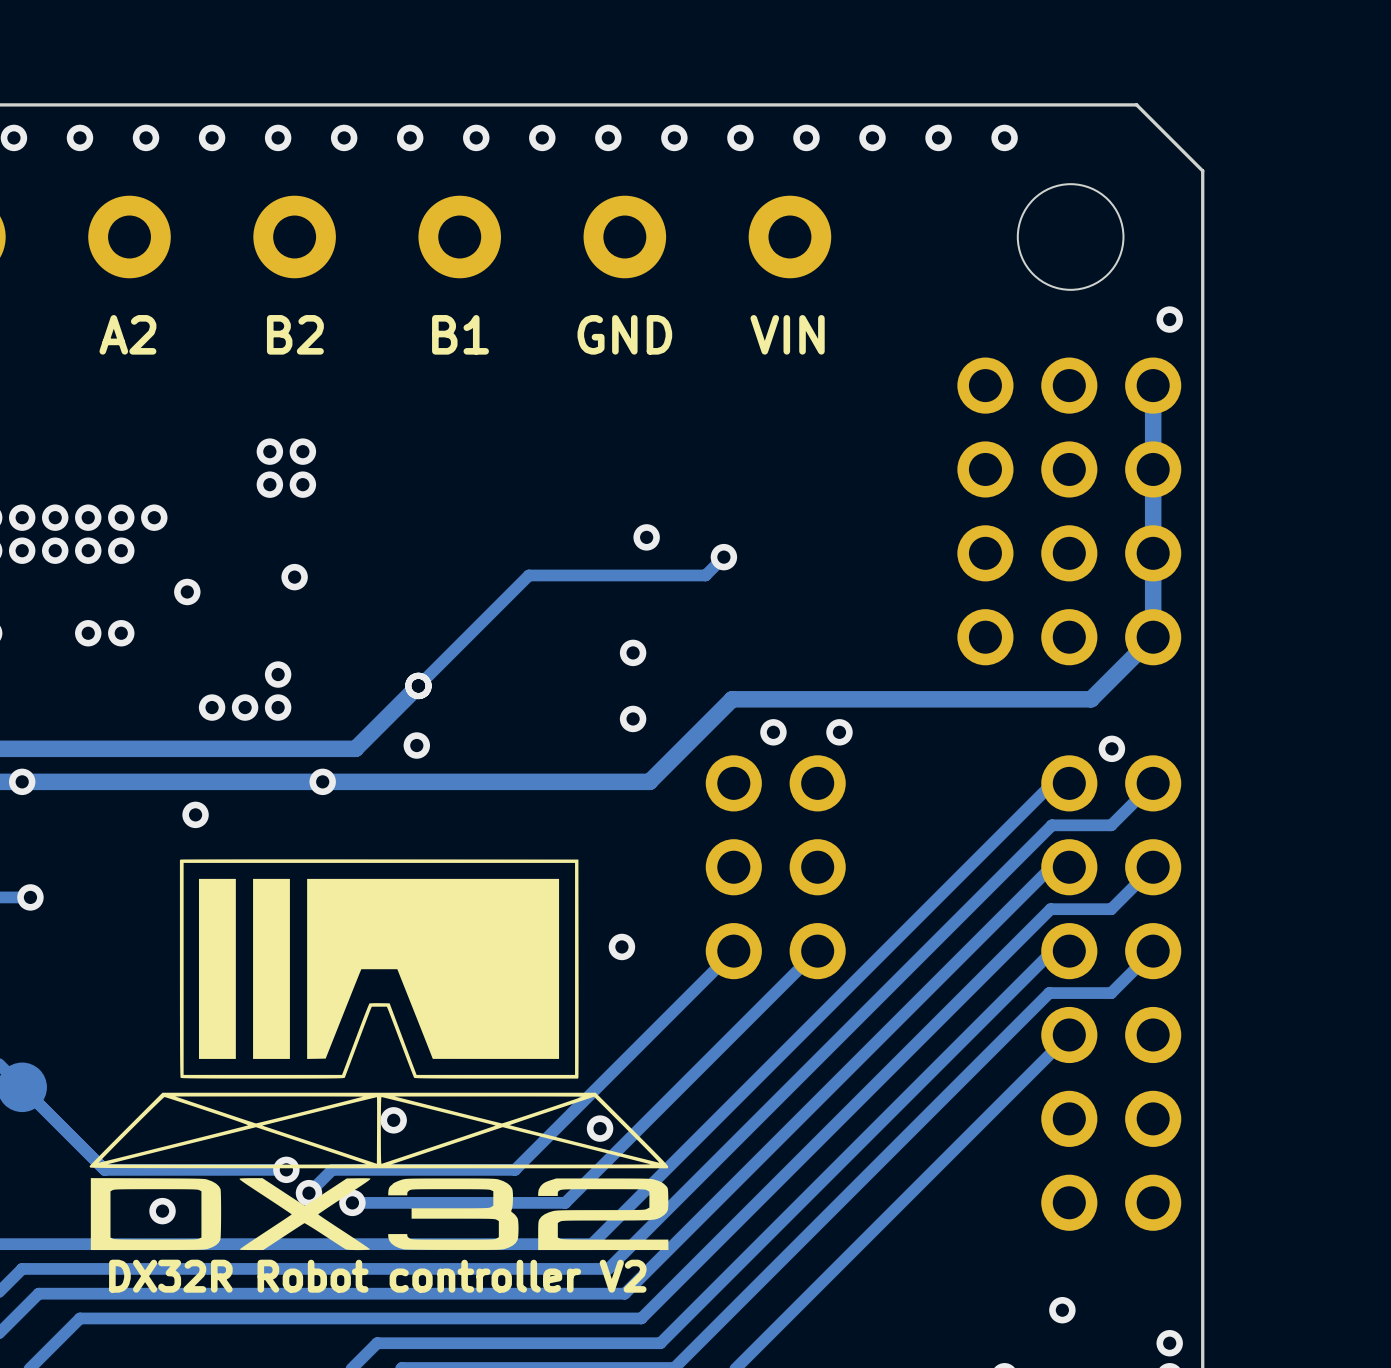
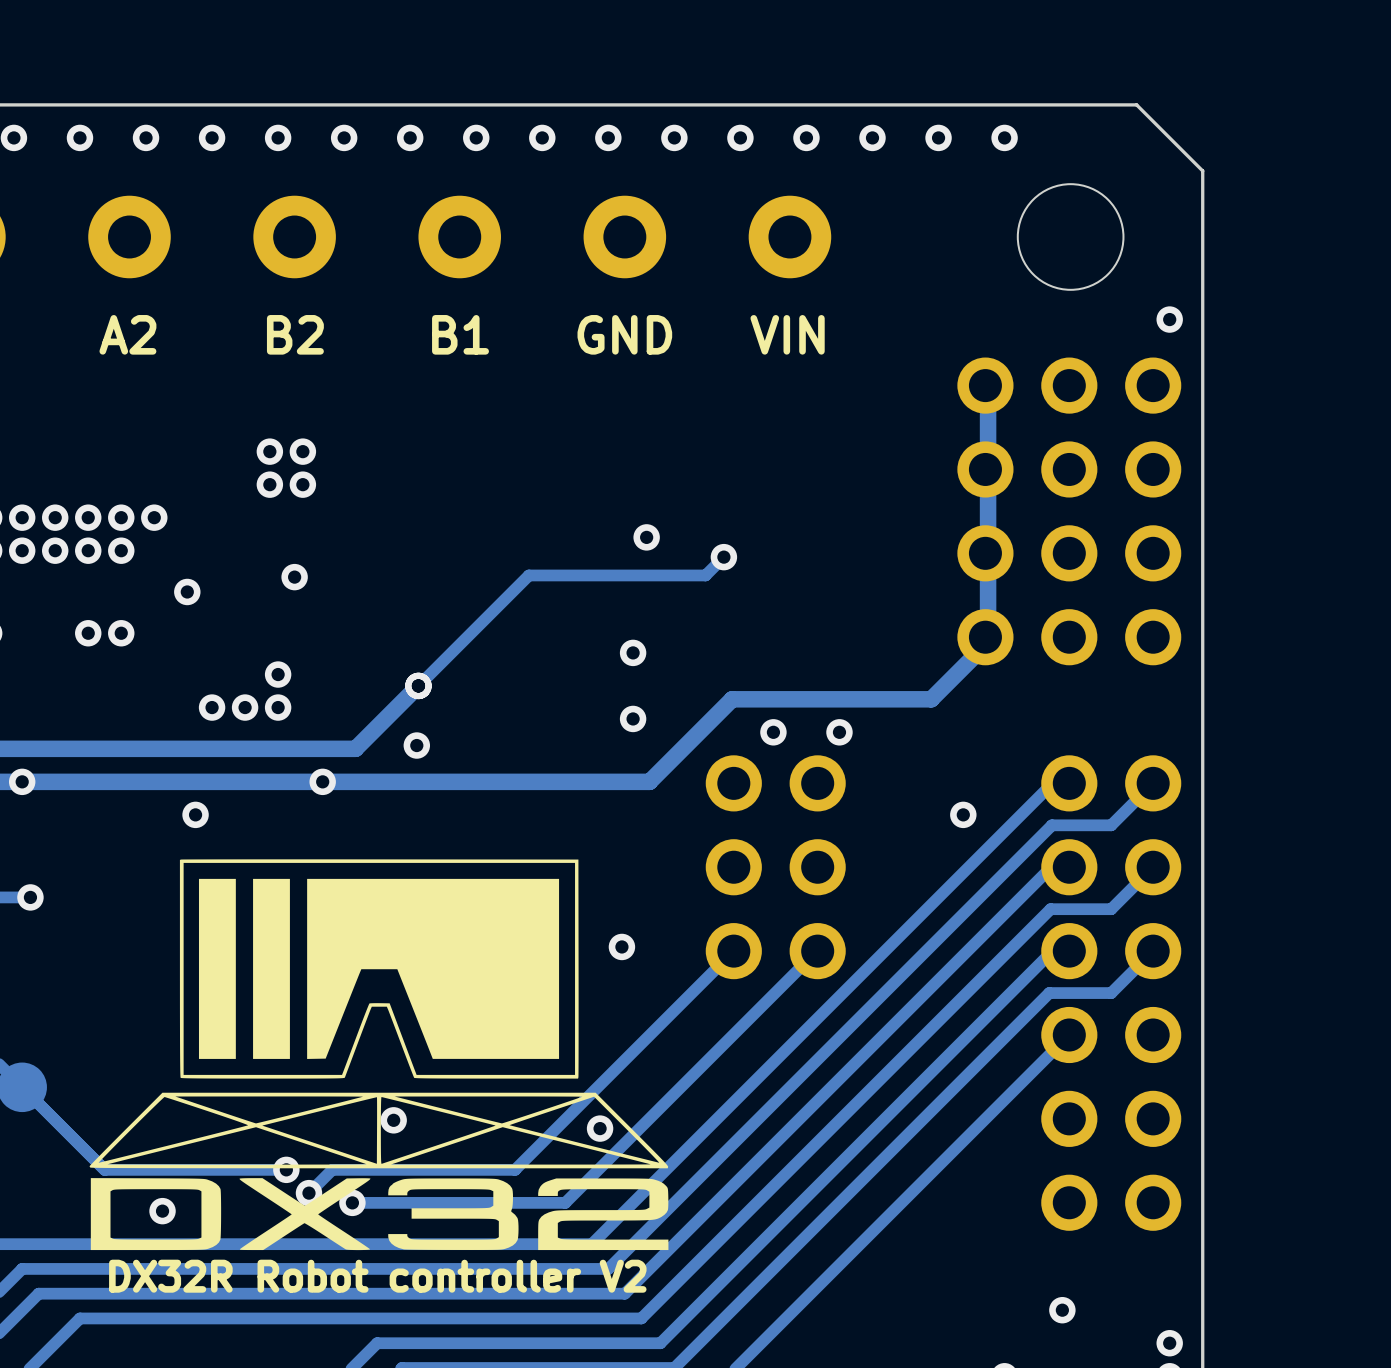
track: (1153, 385) (1153, 637) (1091, 699) (931, 699) -> (988, 390) (988, 642) (931, 699)
via position: (1111, 748) -> (963, 814)

